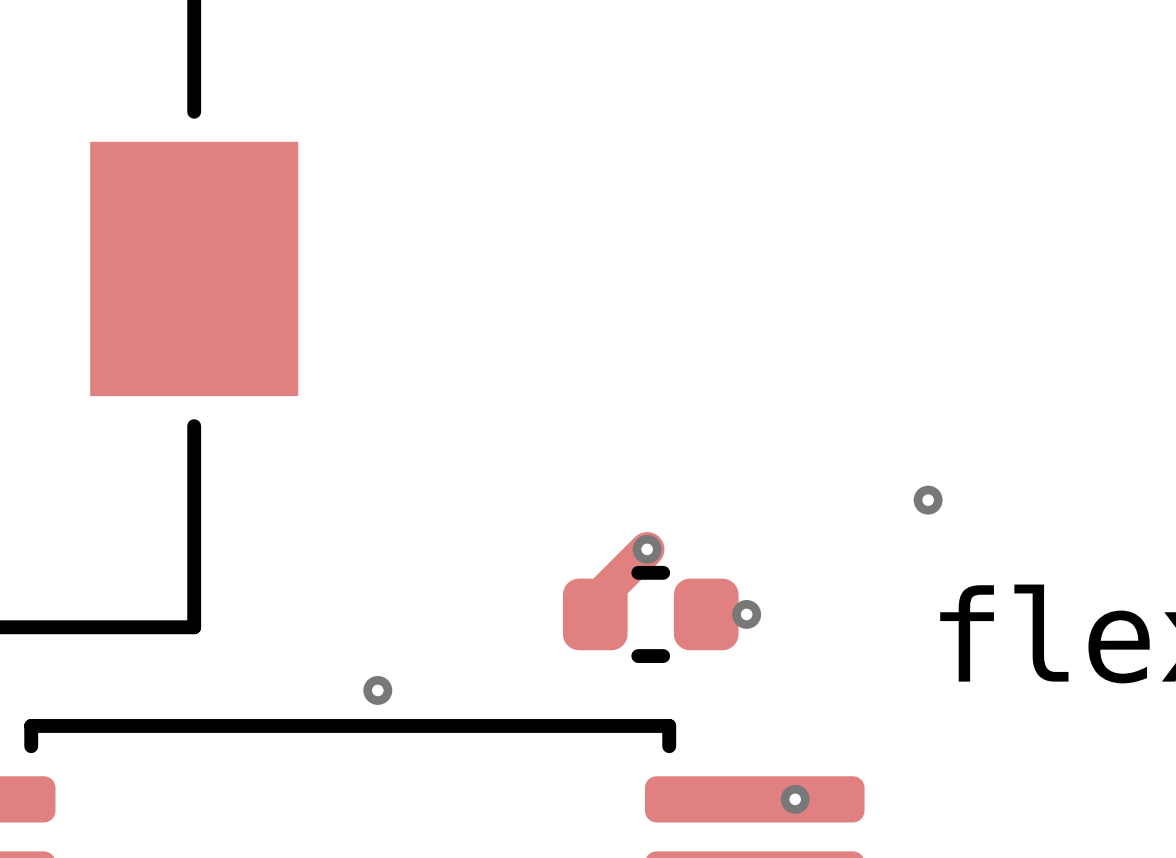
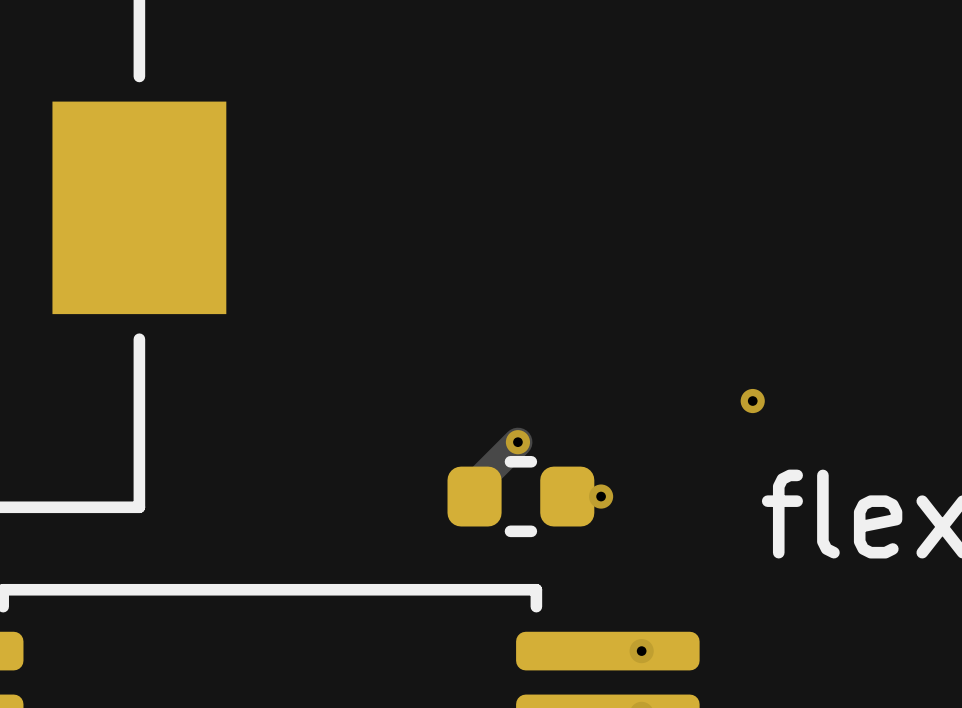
via: (377, 690) -> none

